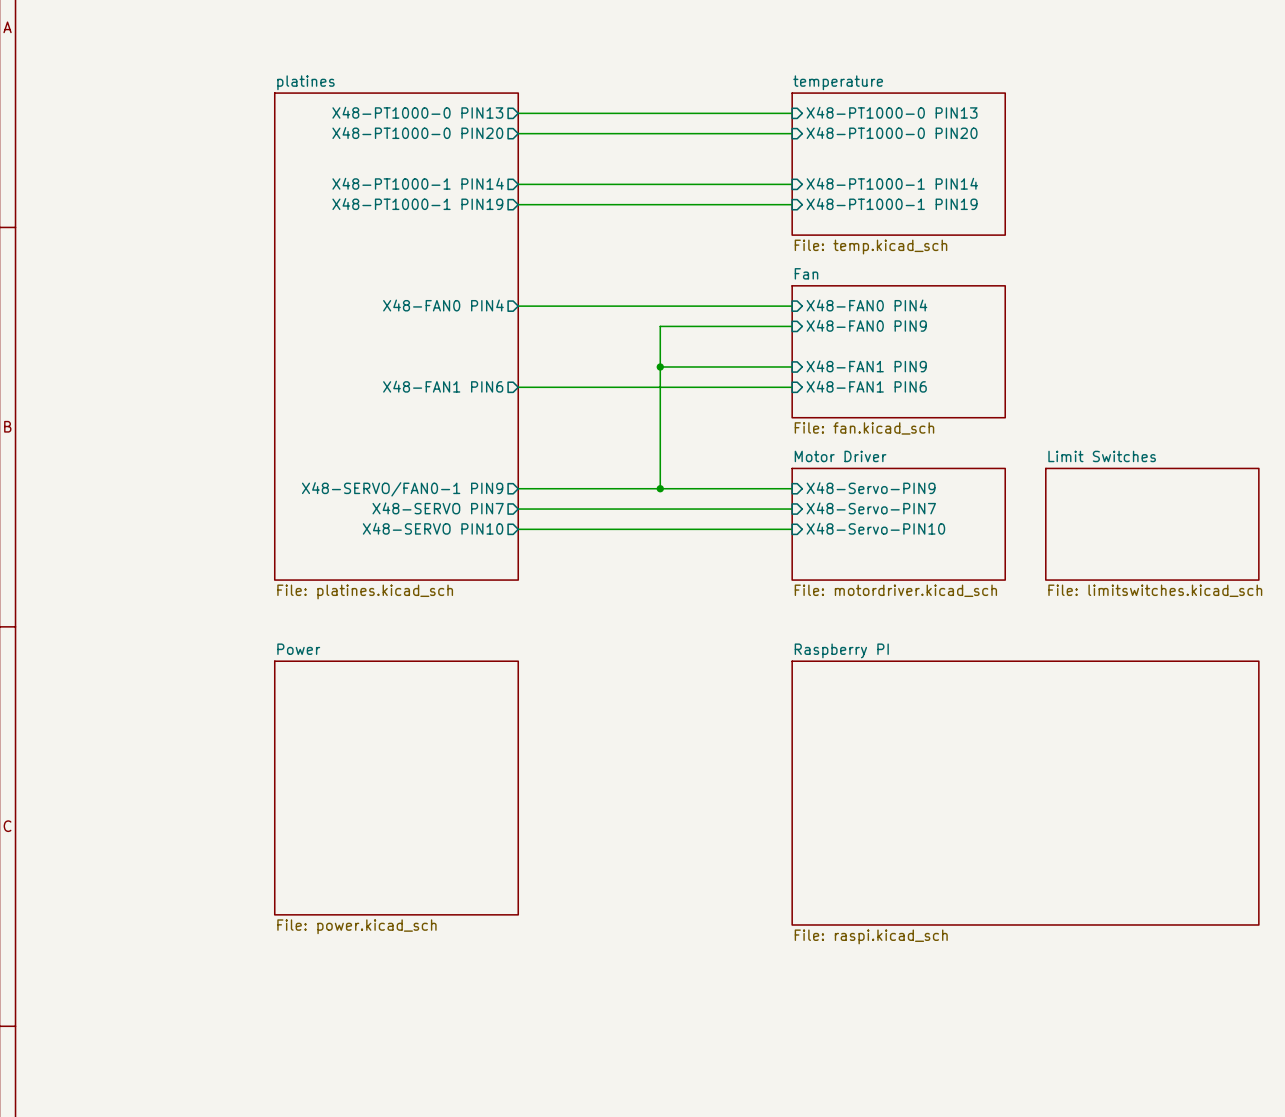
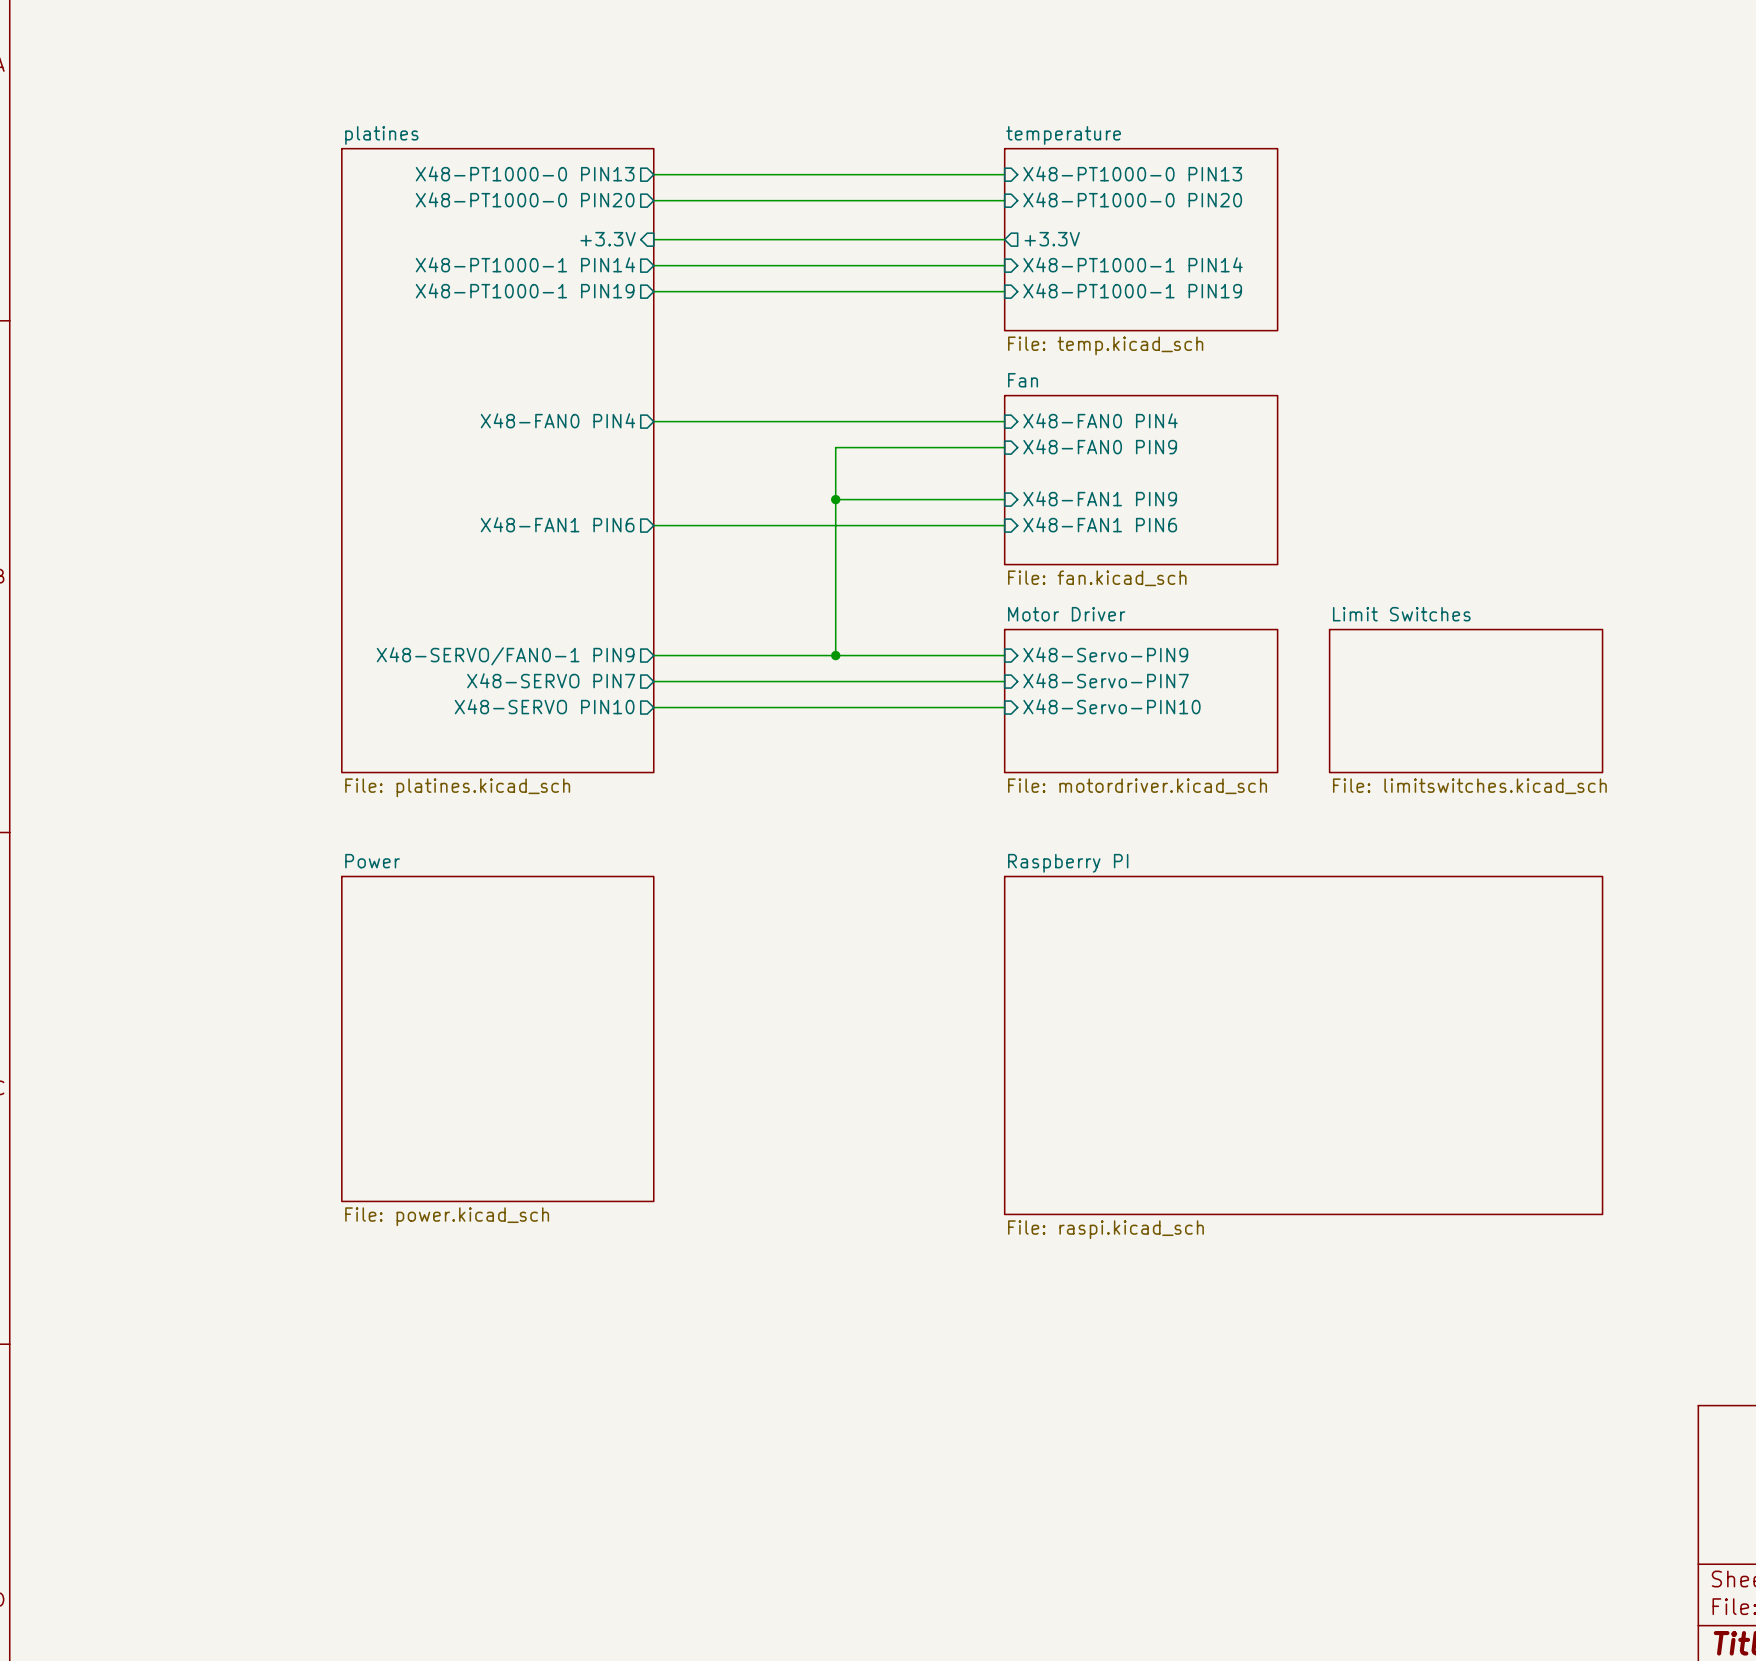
sheet pin: none -> +3.3V (608, 239)
sheet pin: none -> +3.3V (1052, 239)
wire: none -> (653, 239) (1004, 239)

